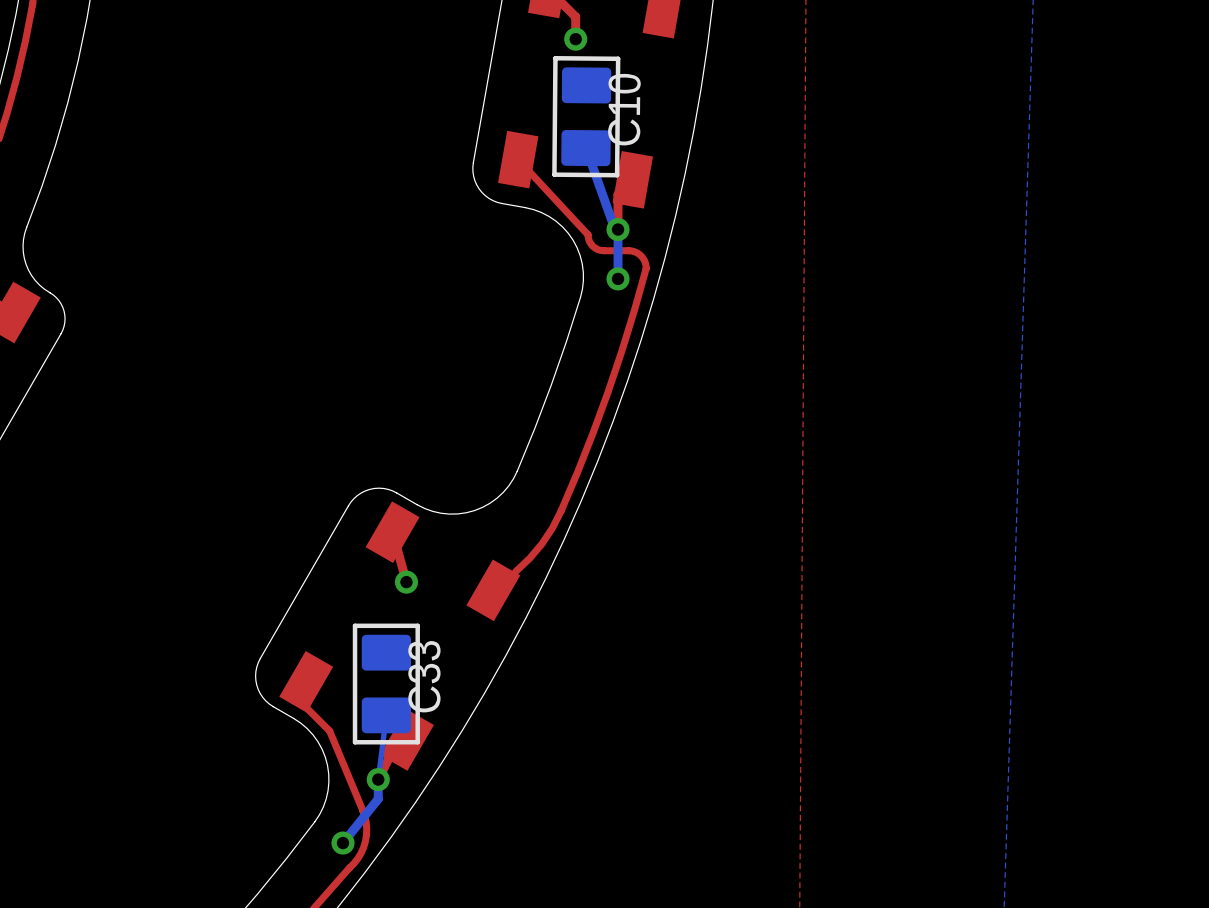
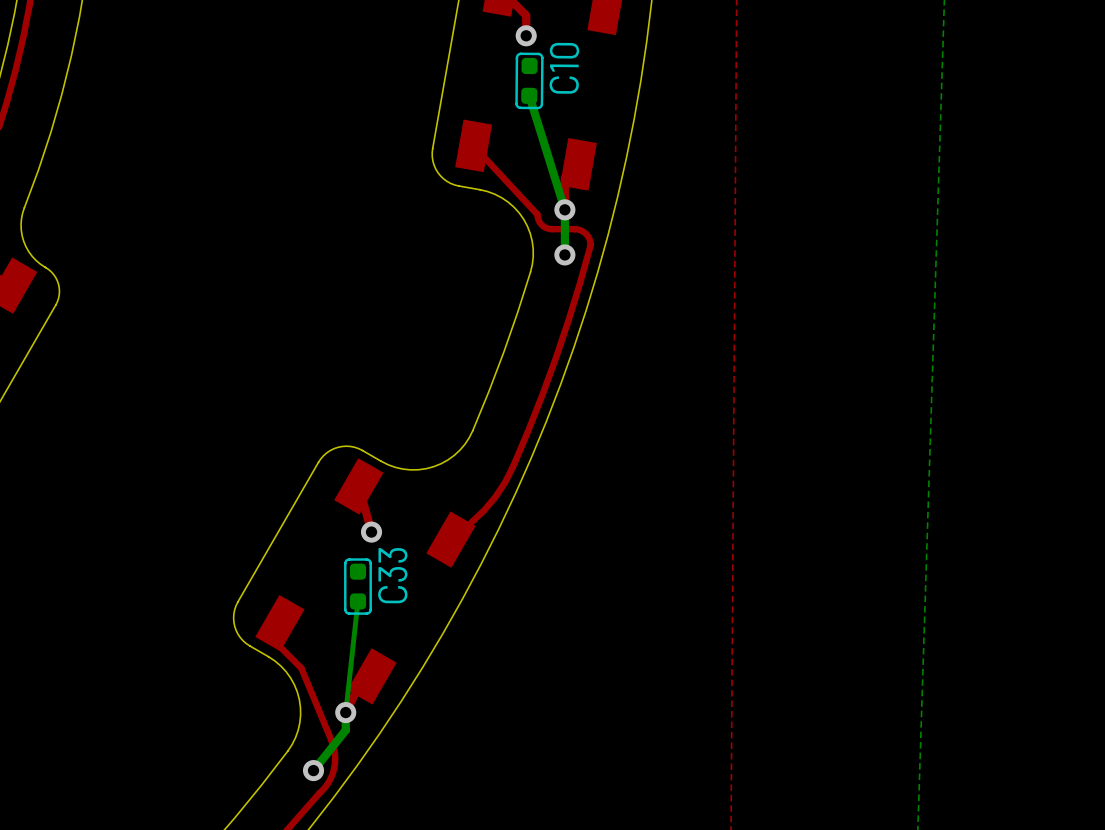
C10 footprint: [552, 56, 621, 178] -> [515, 52, 544, 110]
bottom track: (586, 148) (613, 224) (618, 229) -> (529, 95) (564, 209)
C33 footprint: [352, 623, 420, 745] -> [344, 558, 372, 615]
bottom track: (386, 715) (378, 779) -> (357, 601) (345, 712)

